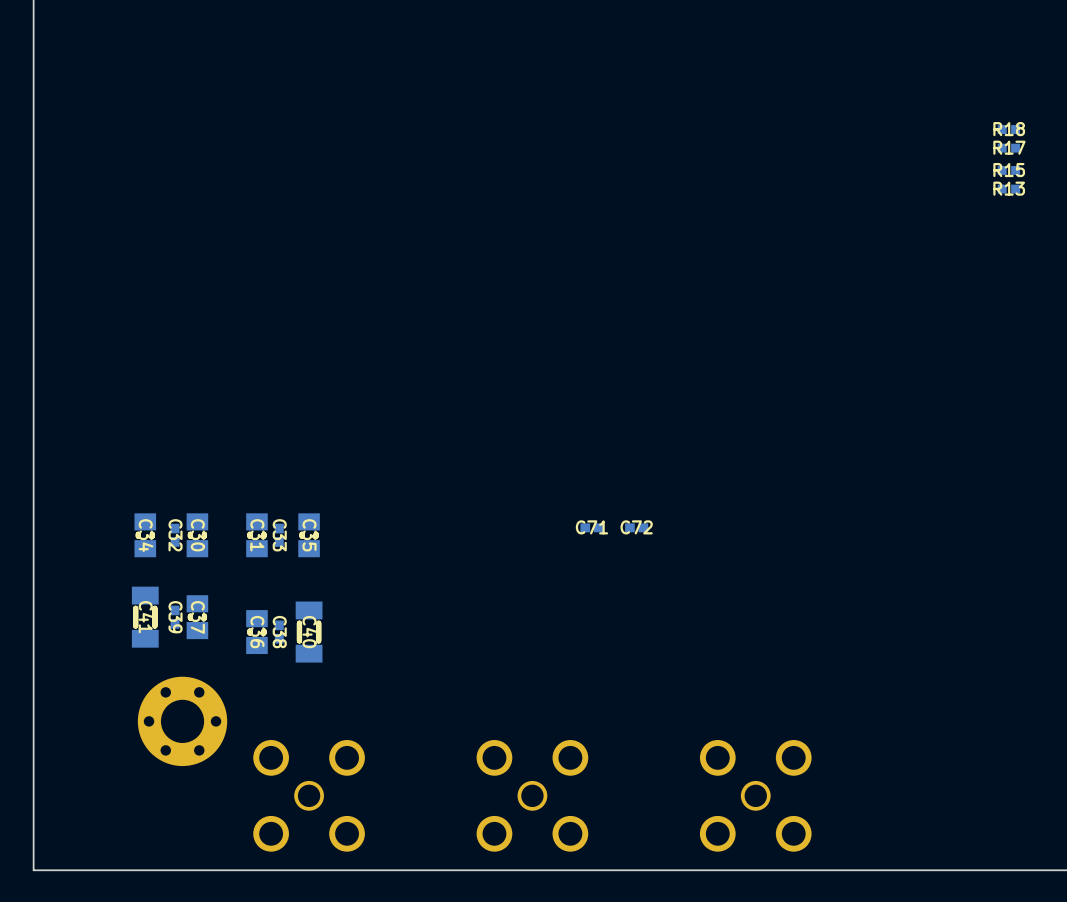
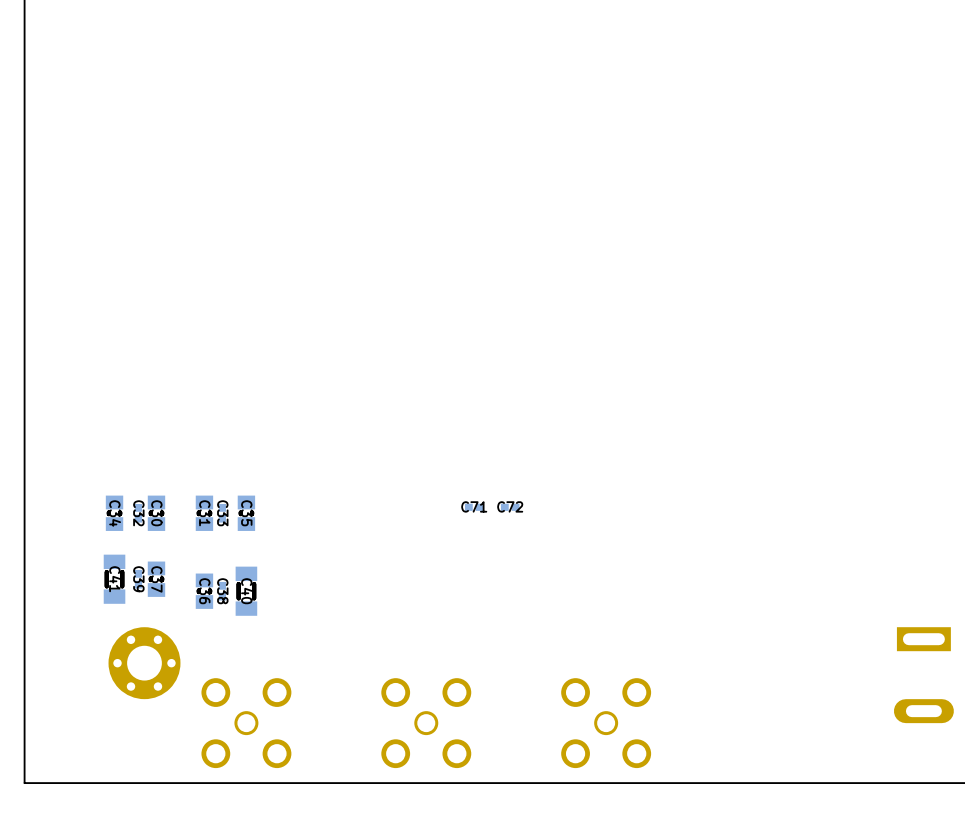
R18: (1008, 129) -> none
R17: (1008, 148) -> none
R15: (1008, 170) -> none
R13: (1008, 189) -> none

